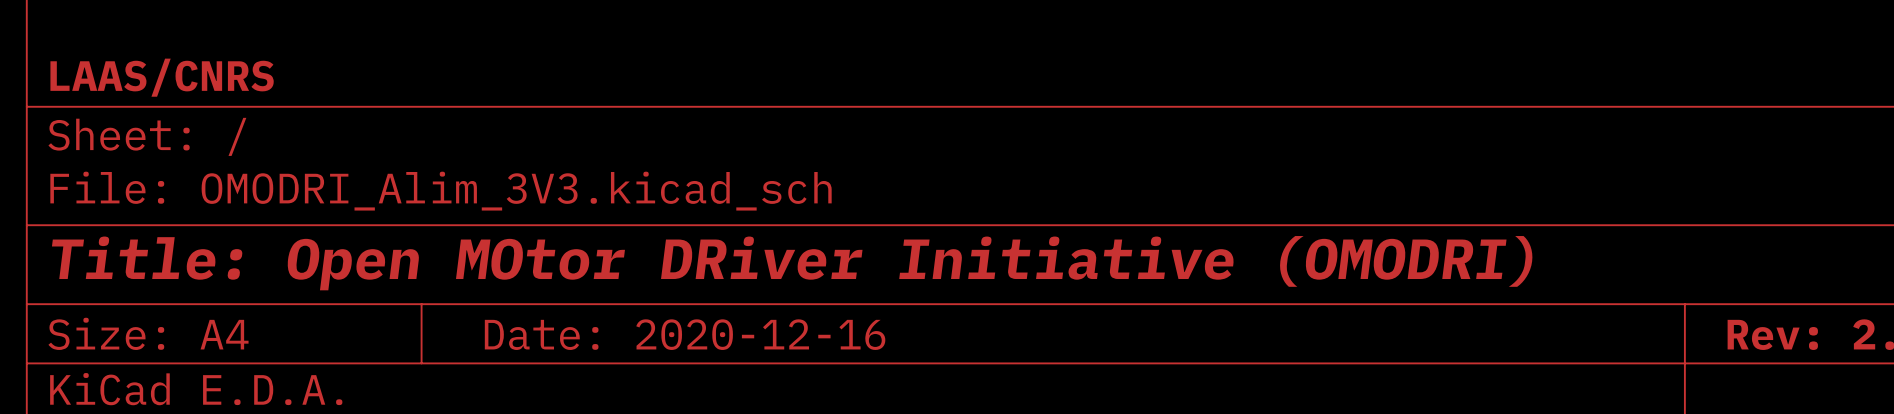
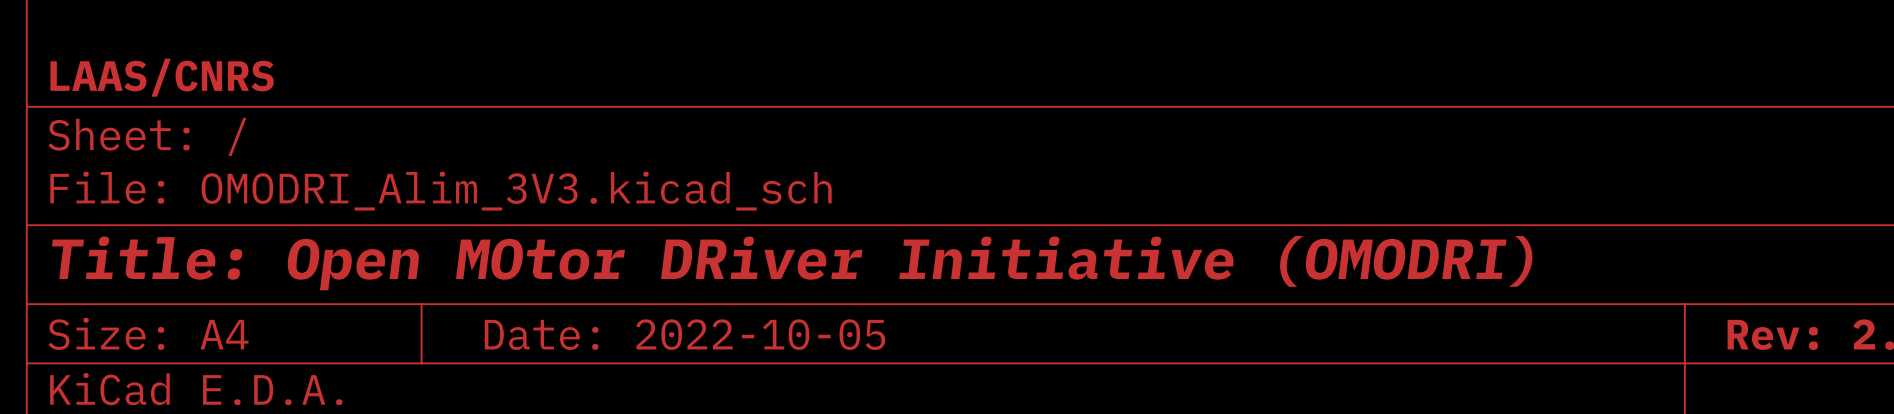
title block: Date: 2020-12-16 (685, 334) -> Date: 2022-10-05 (685, 334)

